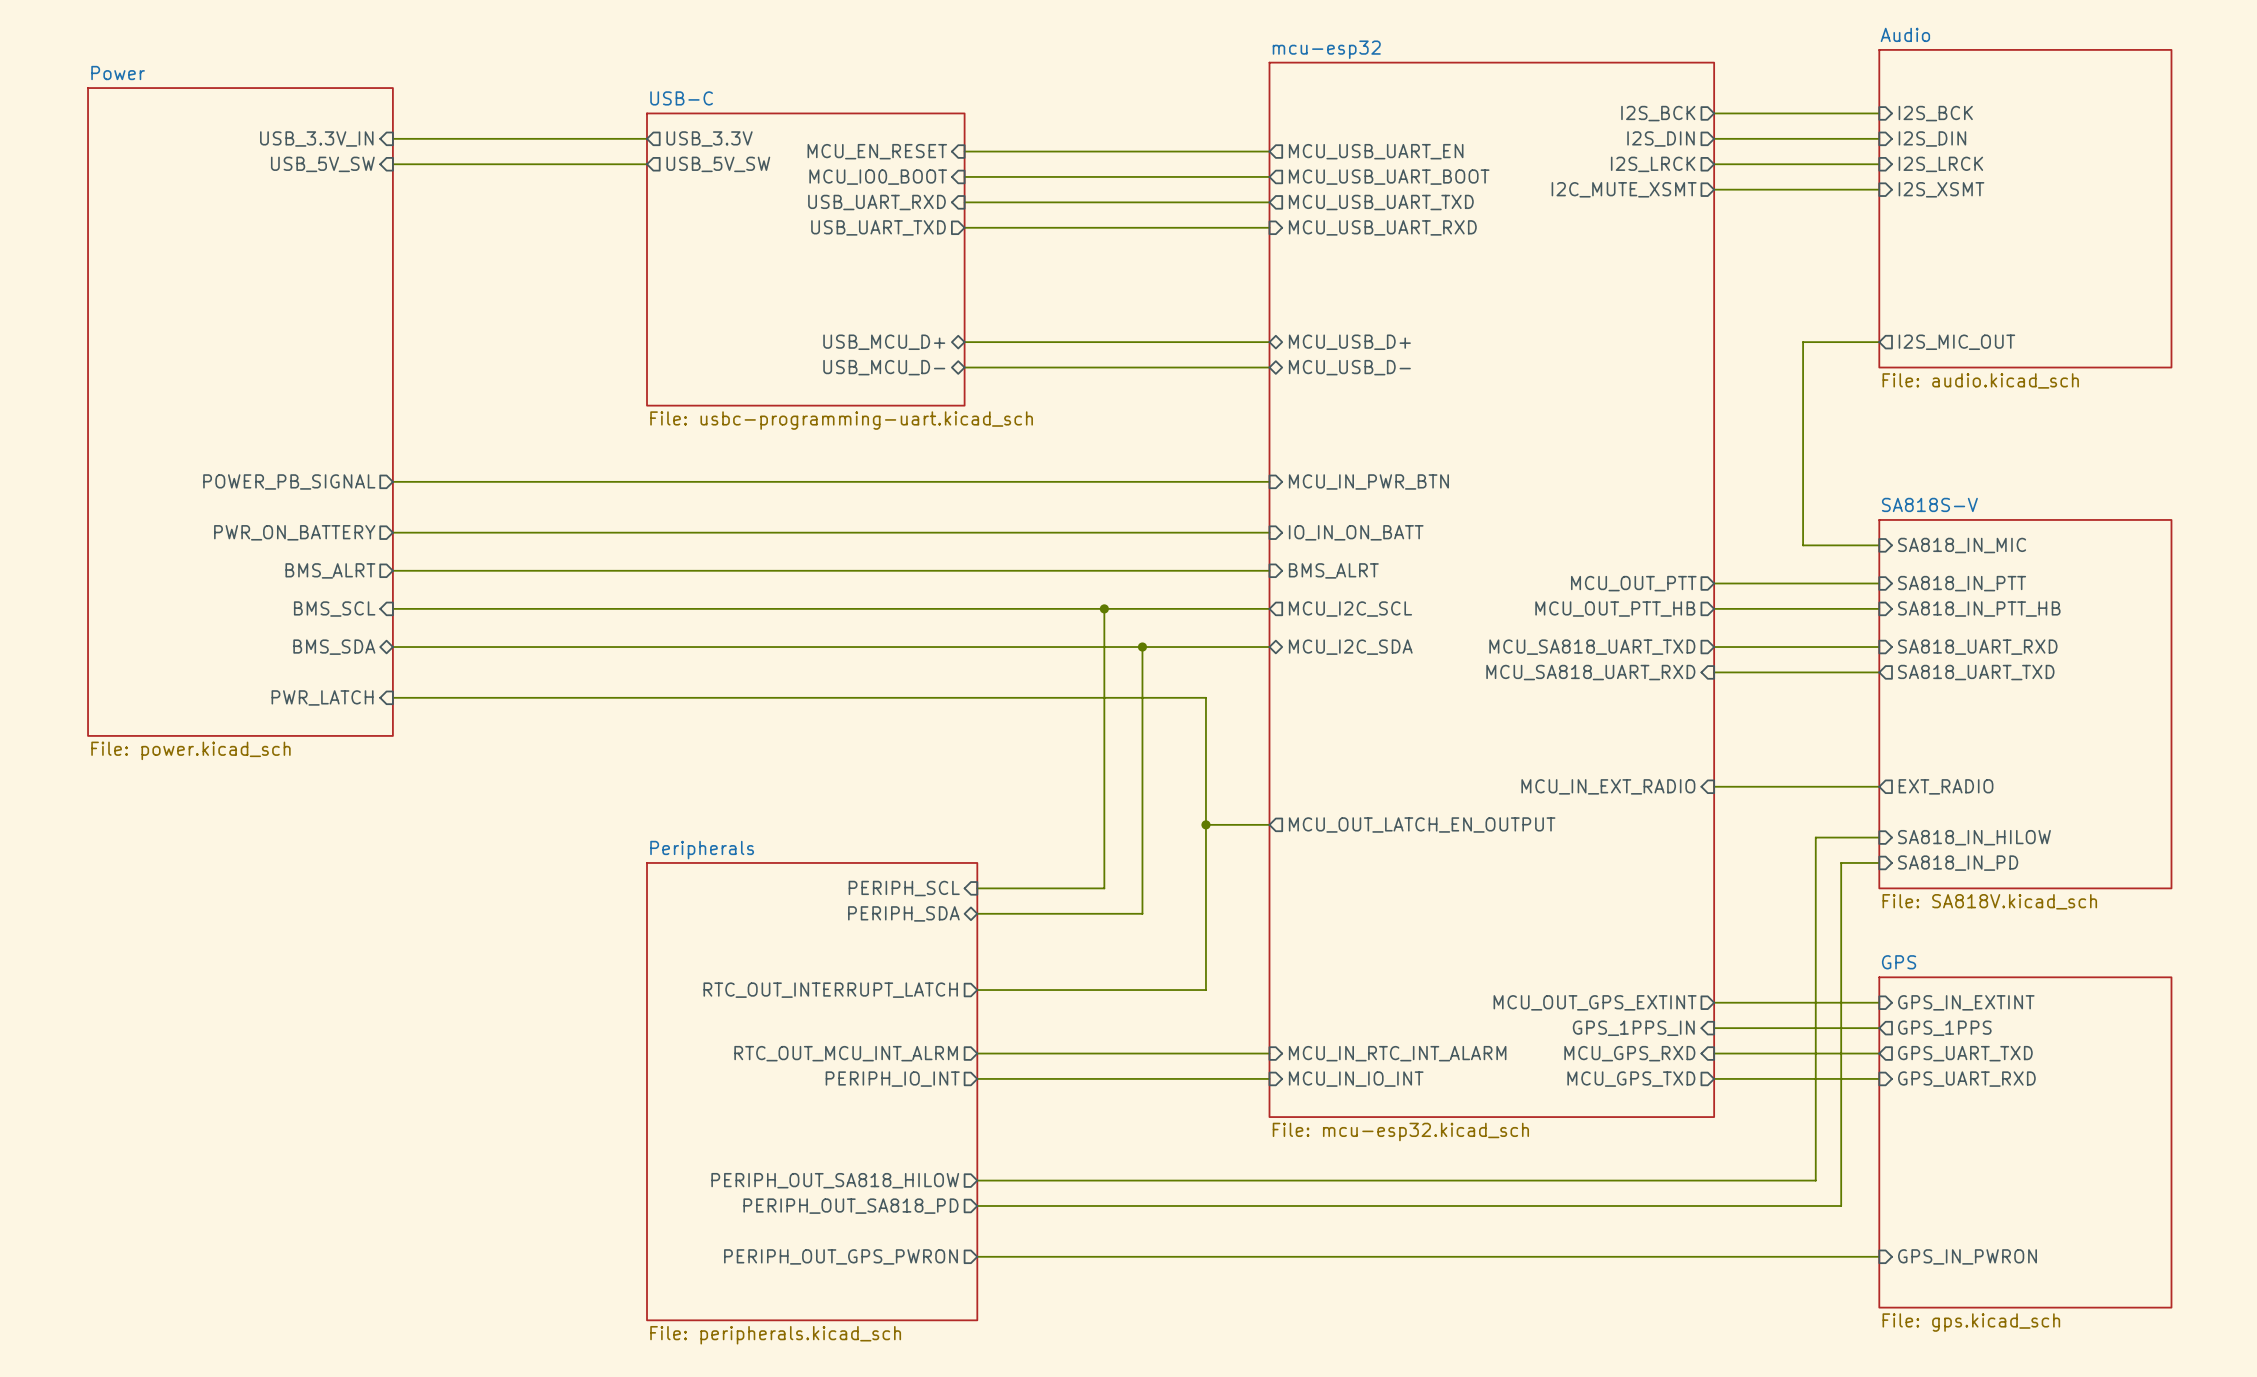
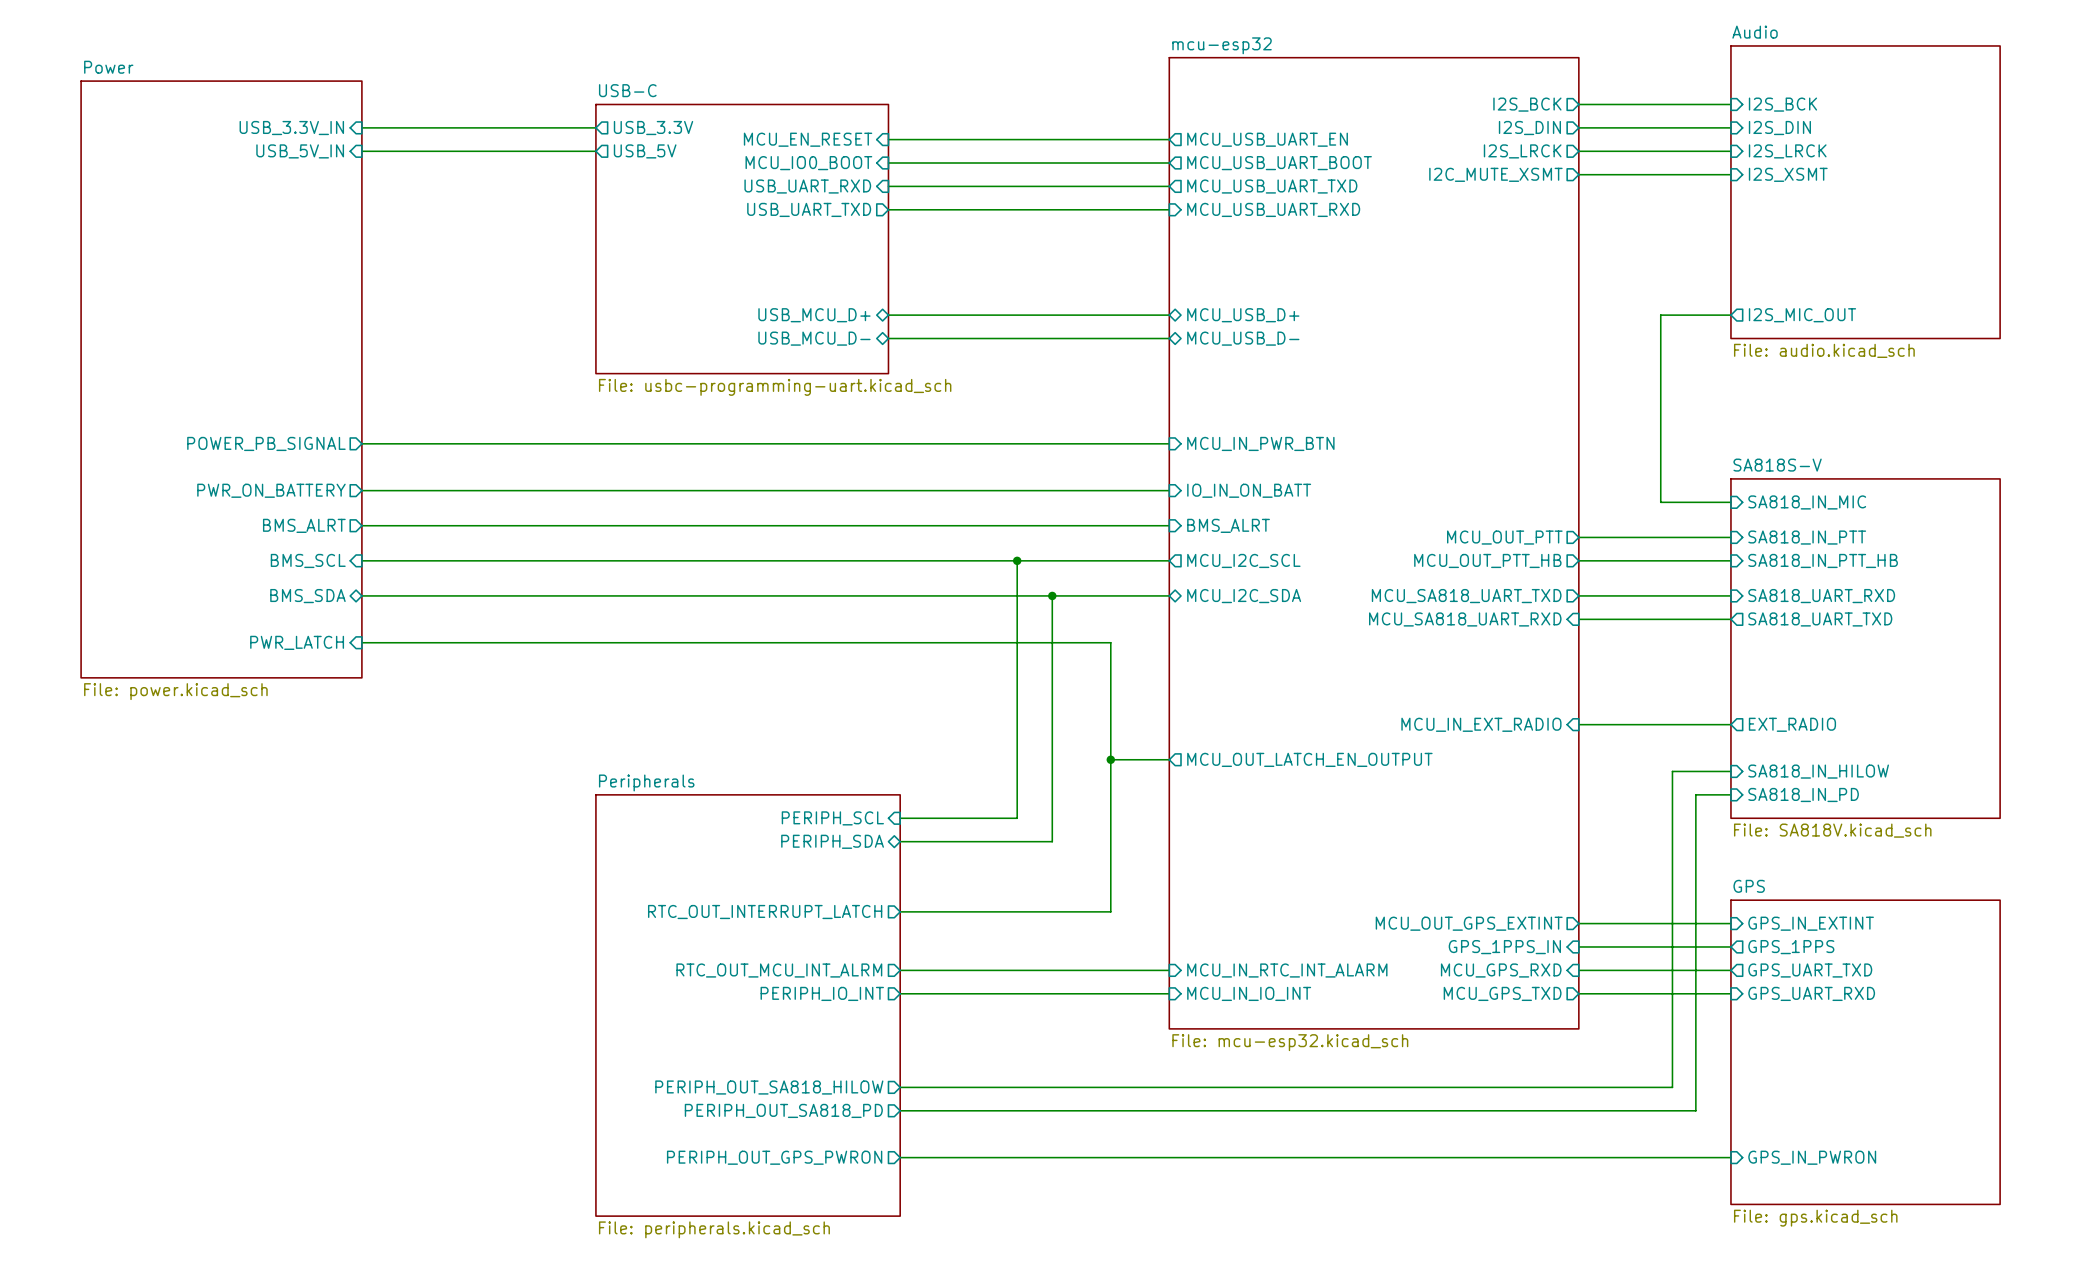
sheet pin: USB_5V_SW (322, 164) -> USB_5V_IN (300, 151)
sheet pin: USB_5V_SW (718, 164) -> USB_5V (645, 151)

